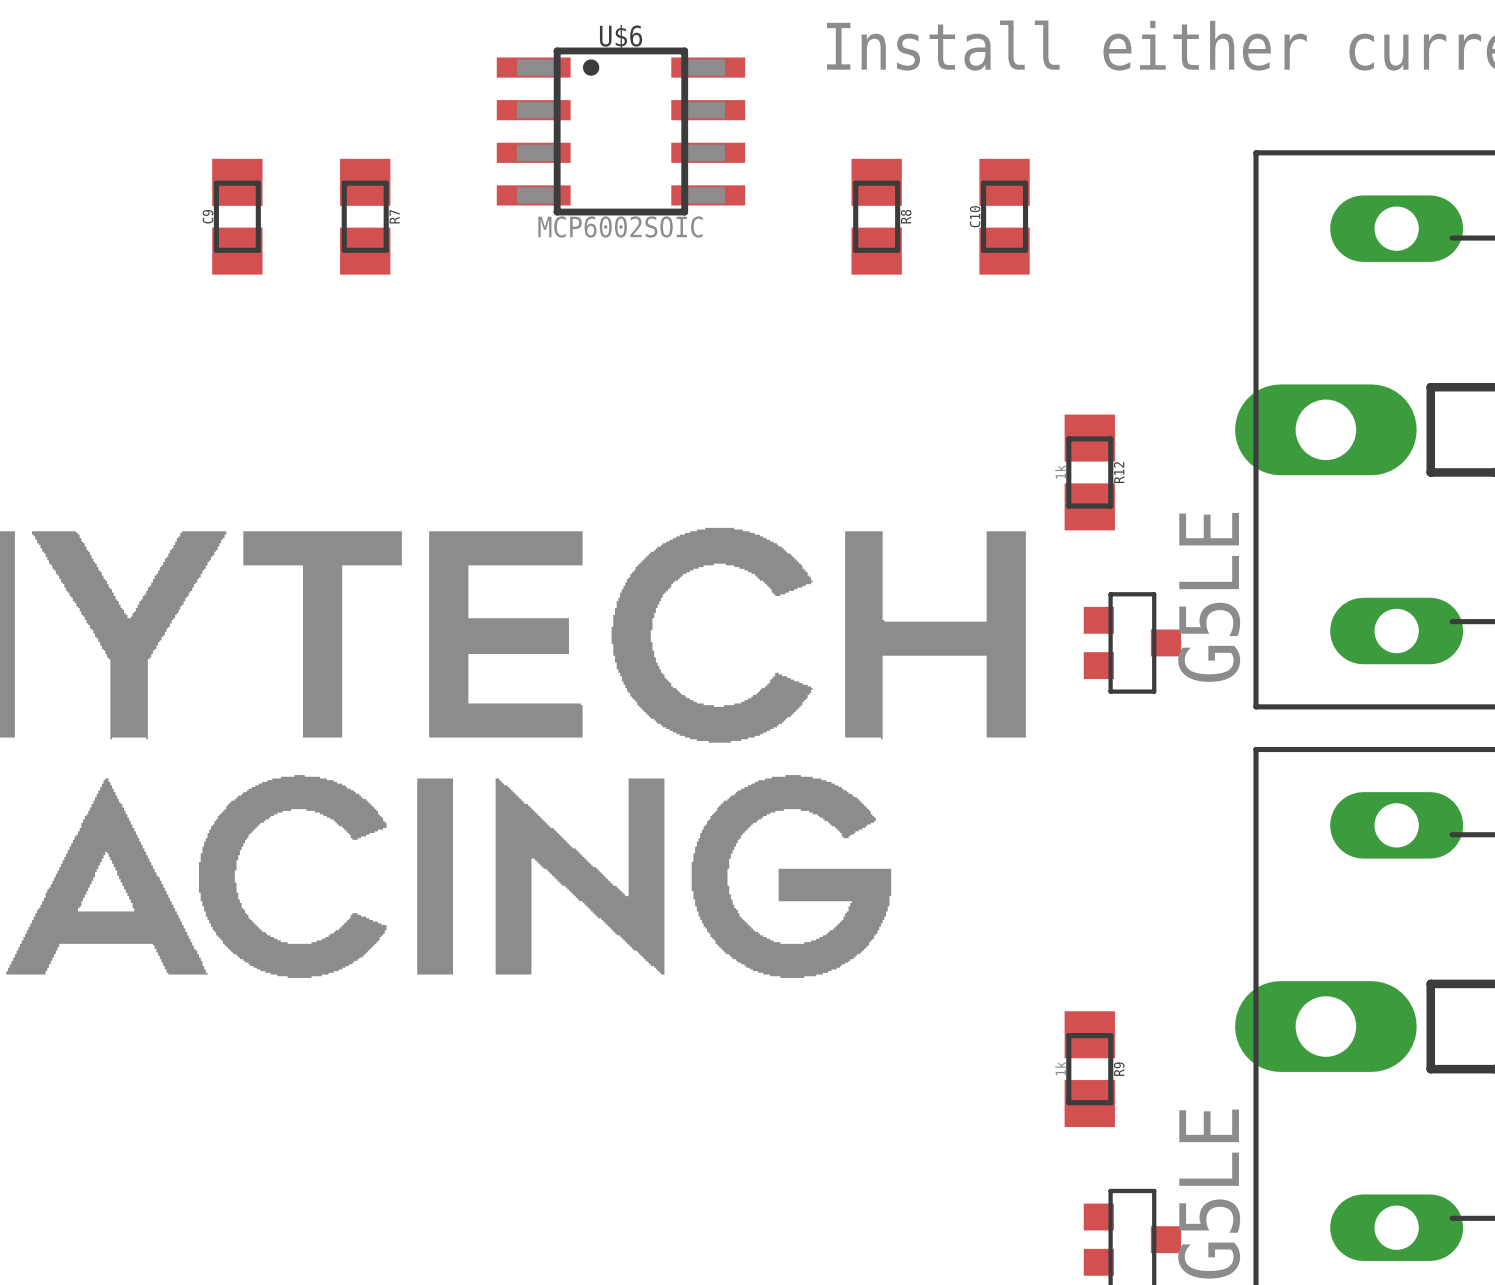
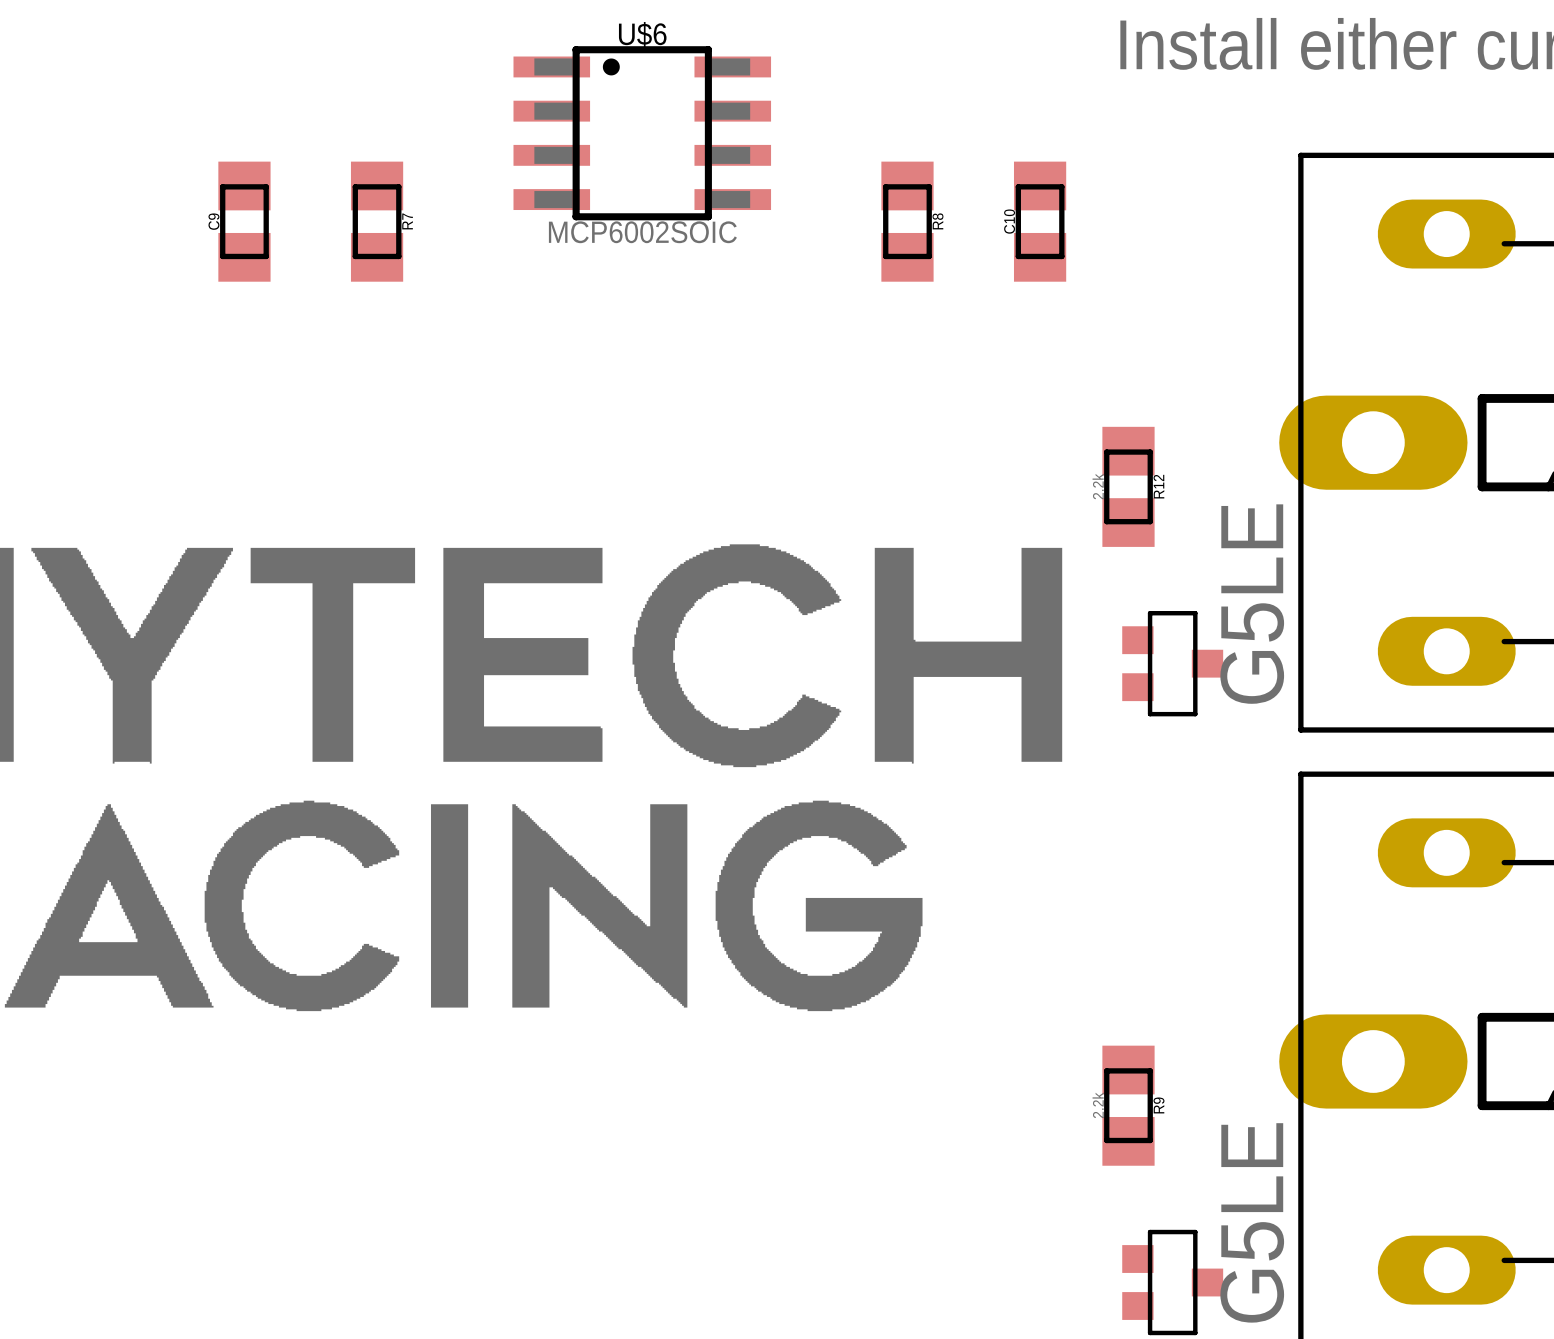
R12 value: 1k (1060, 471) -> 2.2k (1098, 486)
R9 value: 1k (1060, 1068) -> 2.2k (1098, 1105)

